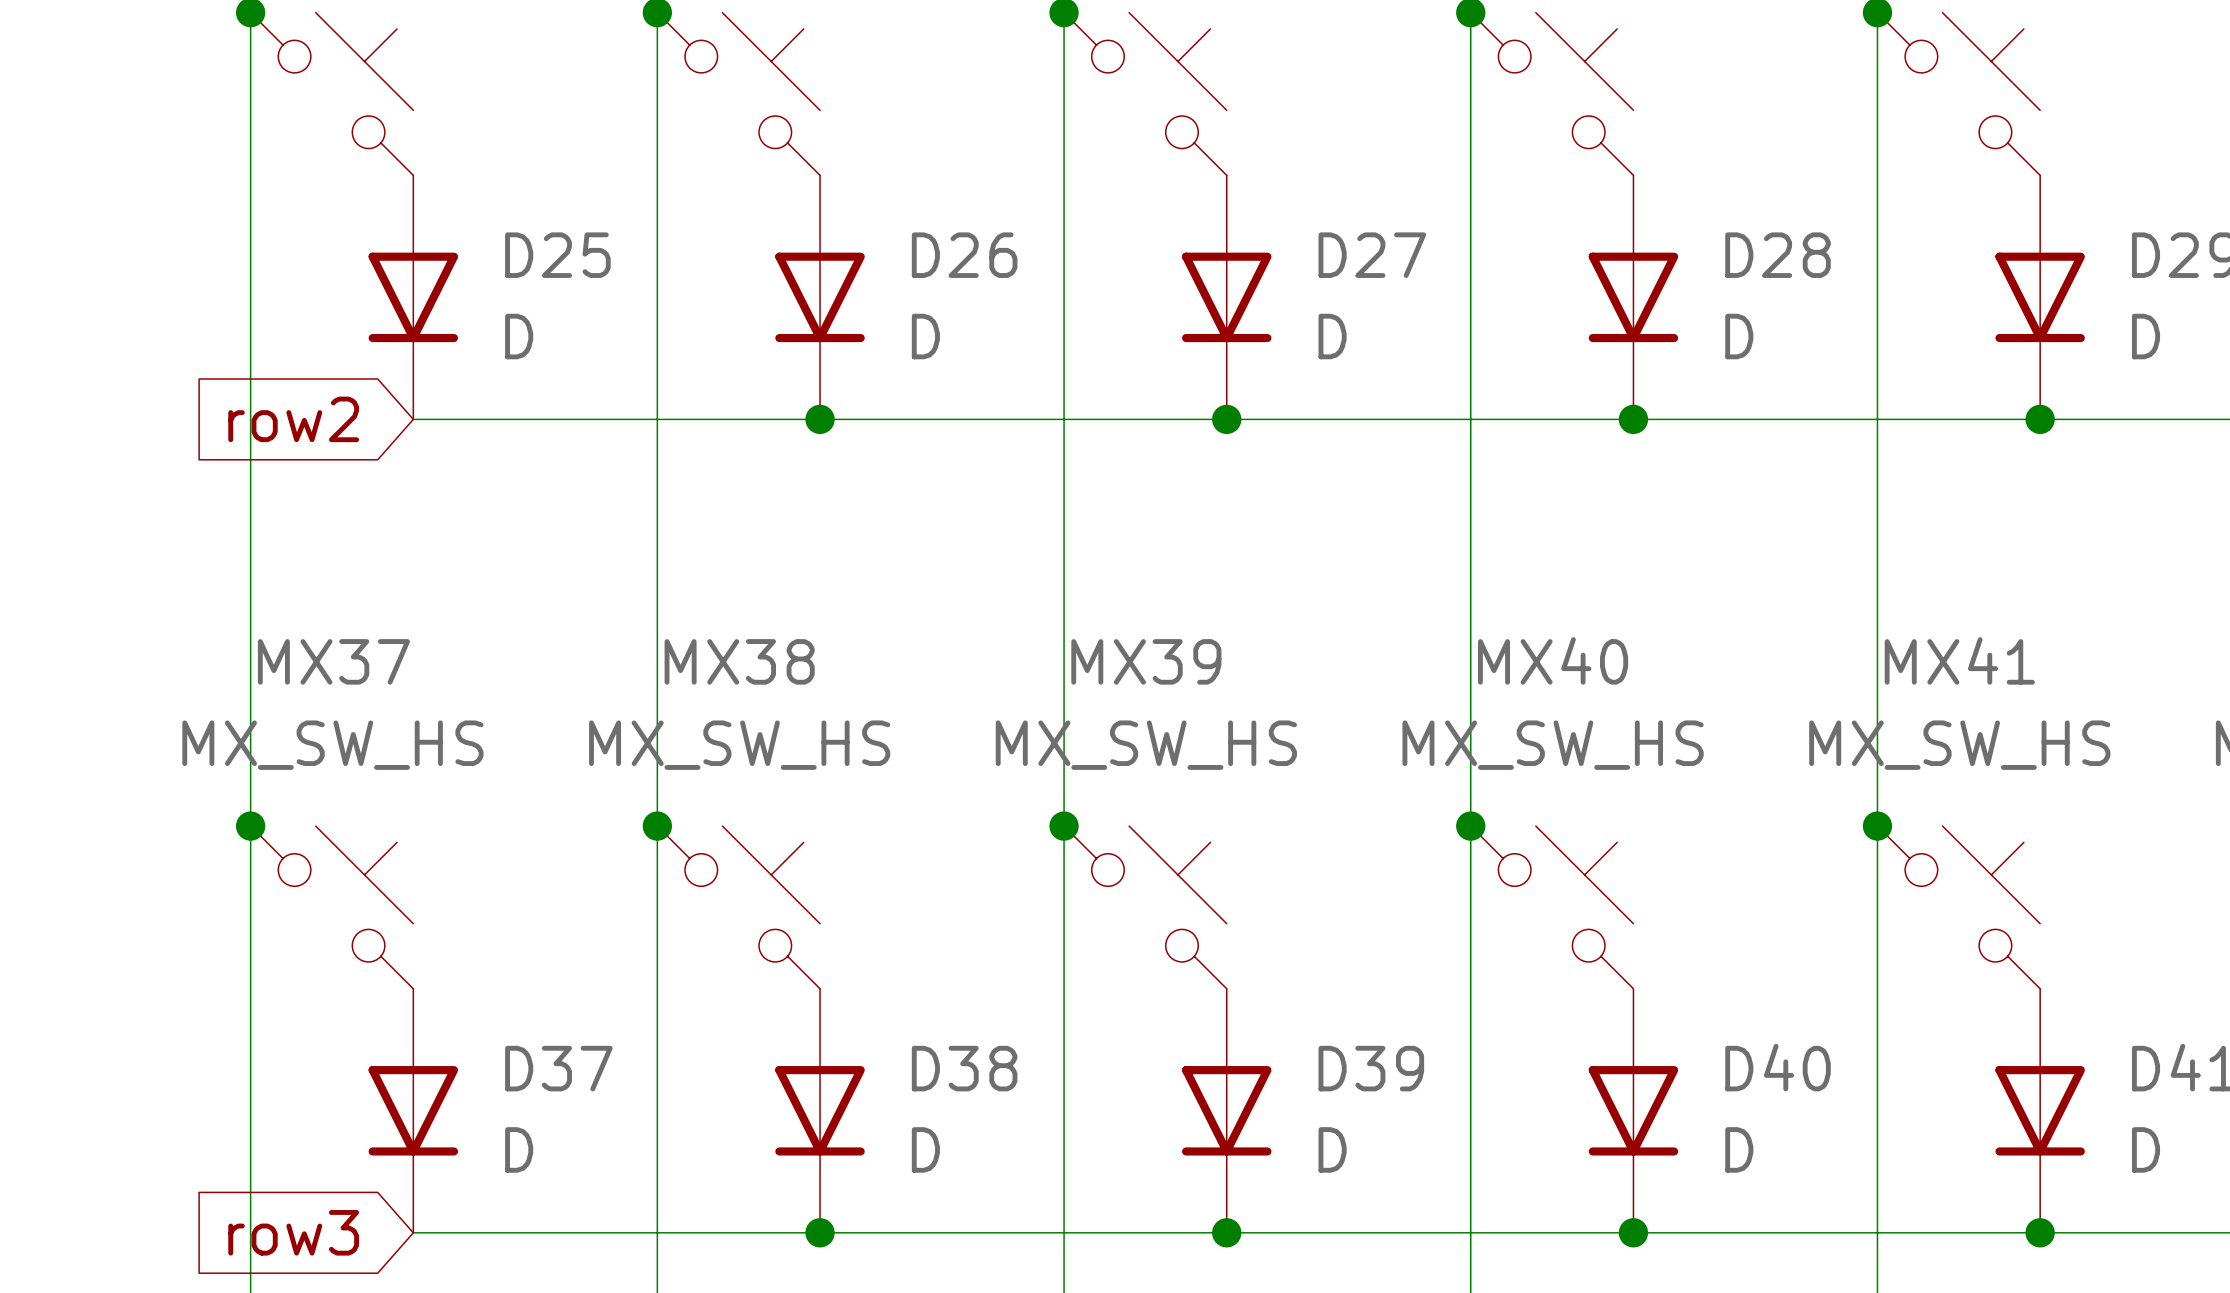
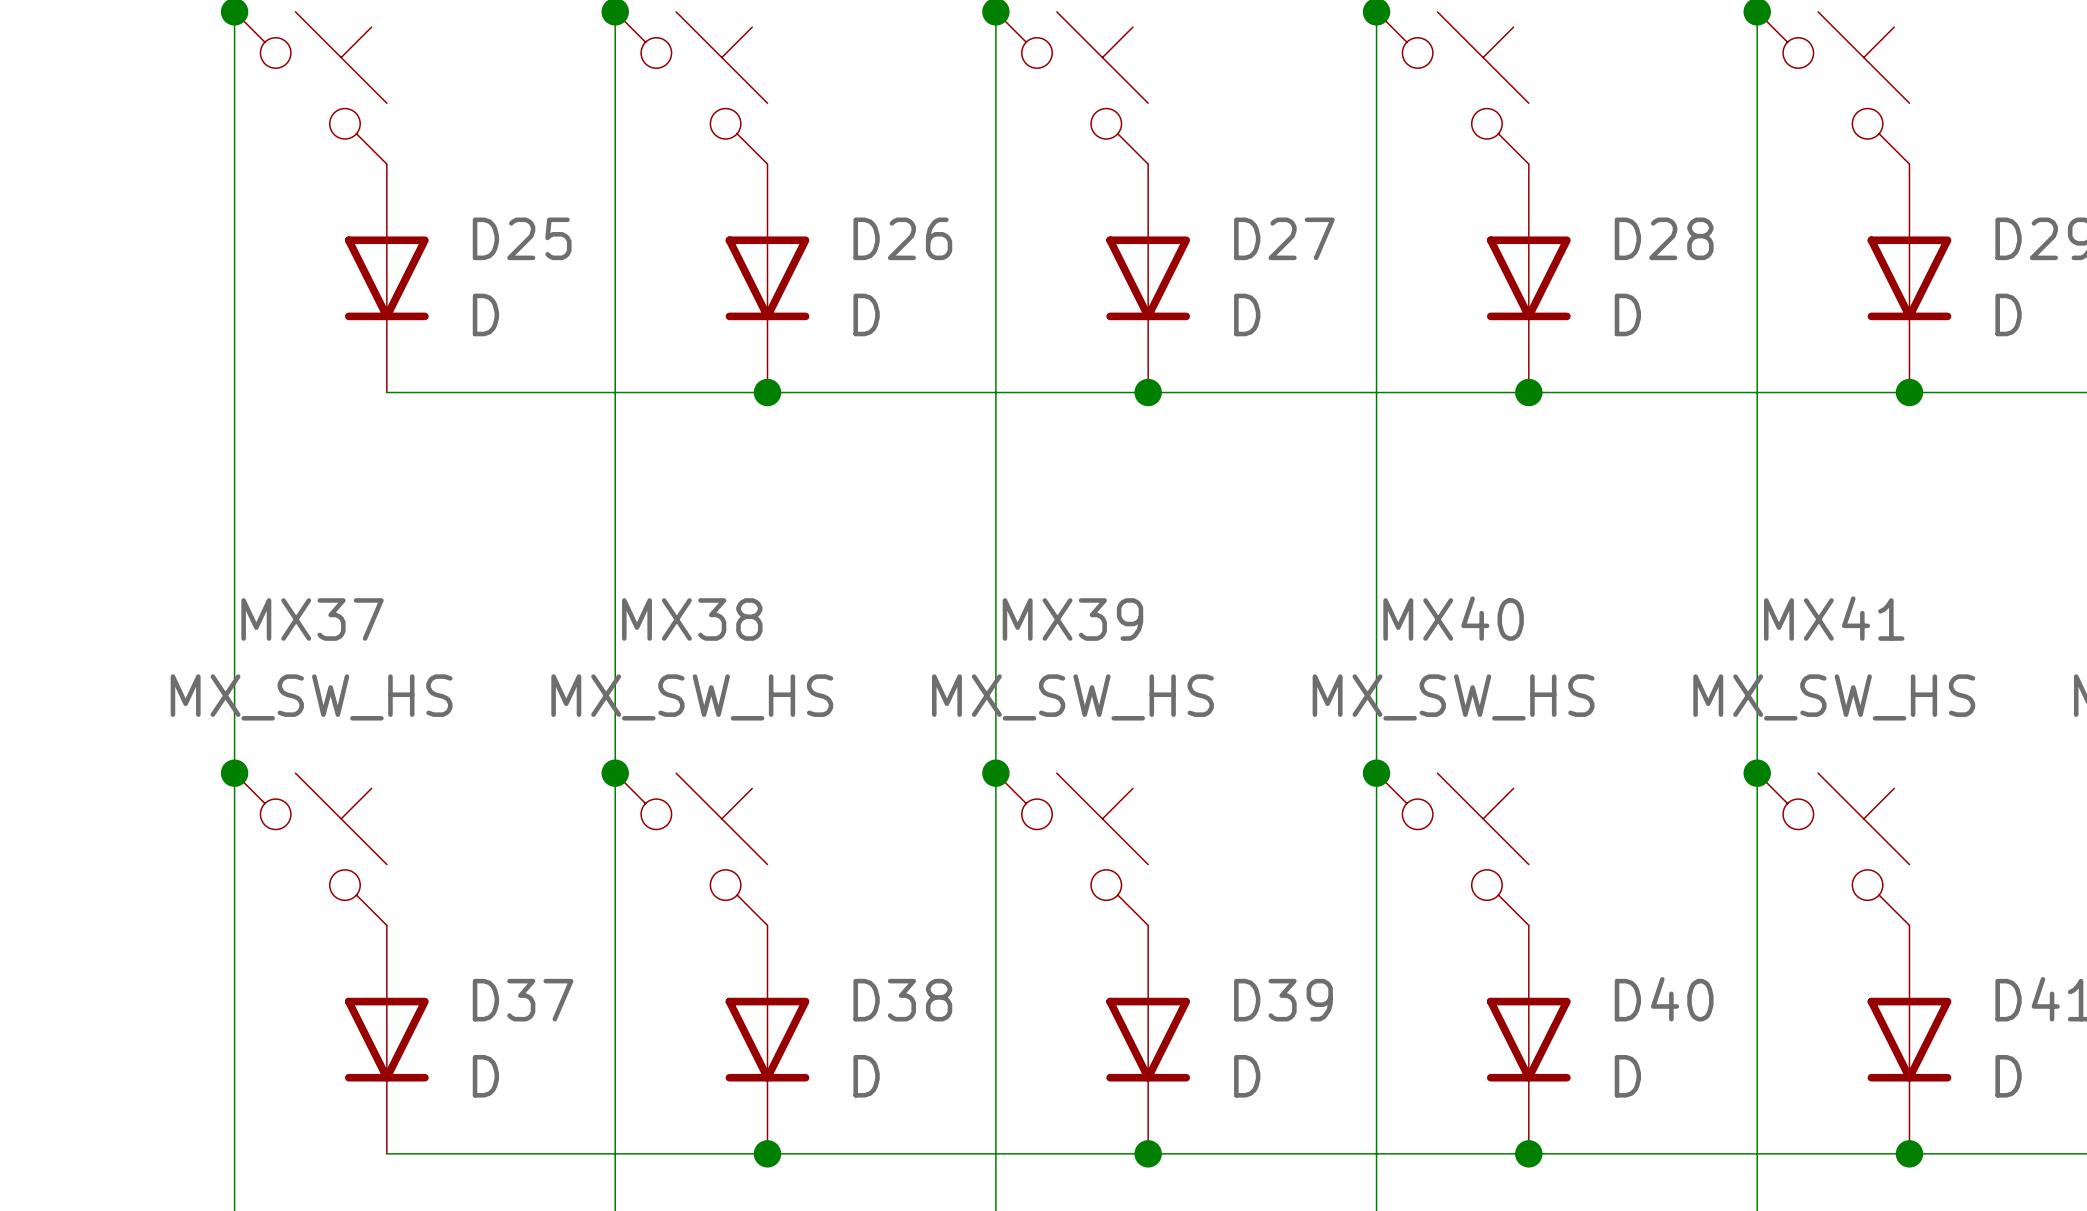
global label: row2 (293, 419) -> none
global label: row3 (293, 1232) -> none

